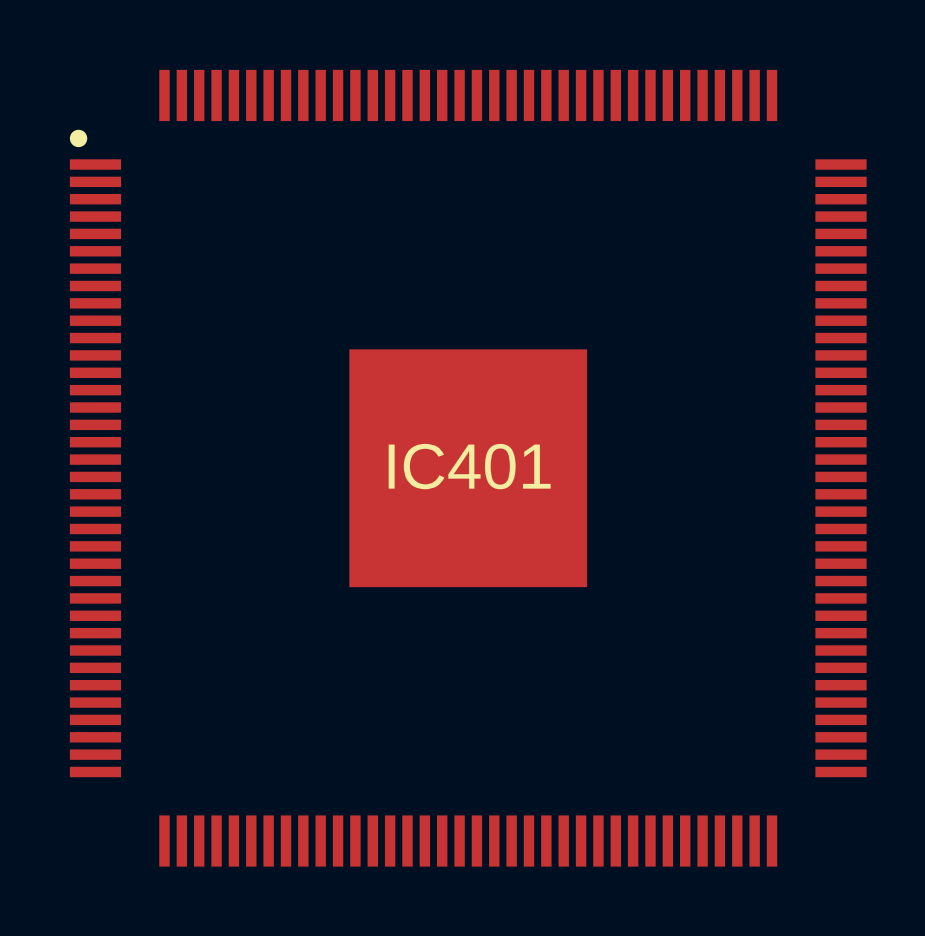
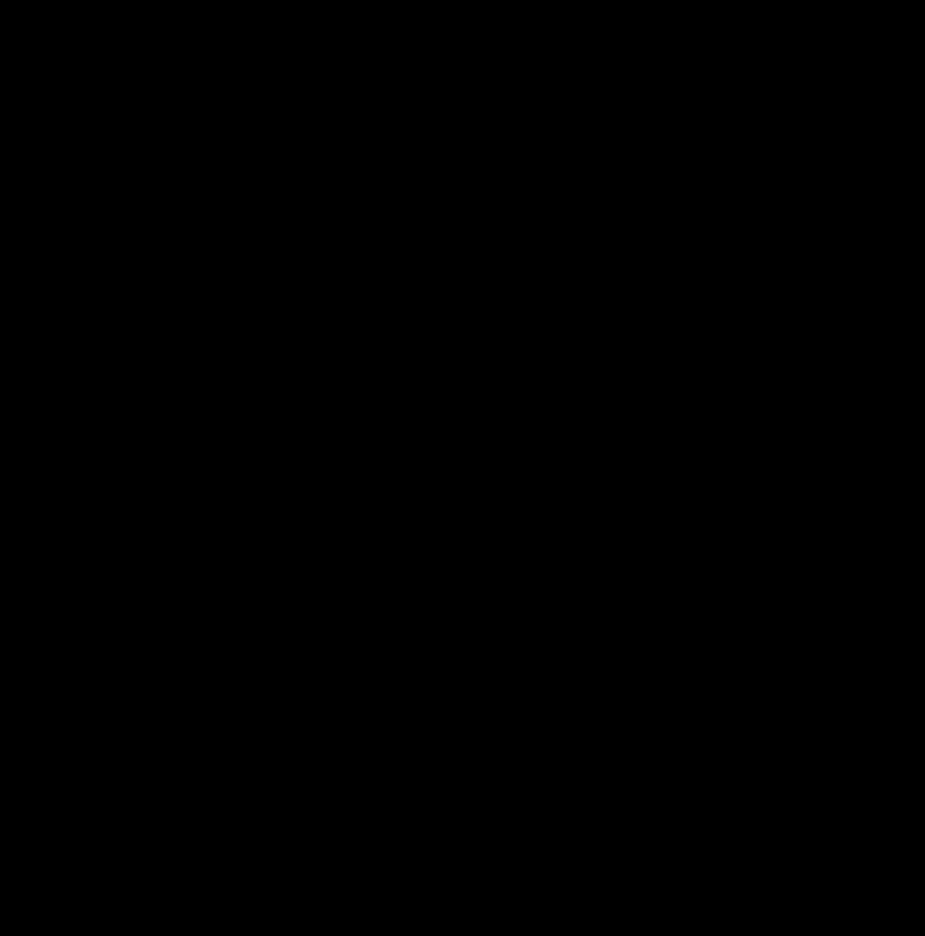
IC401: (468, 468) -> none

